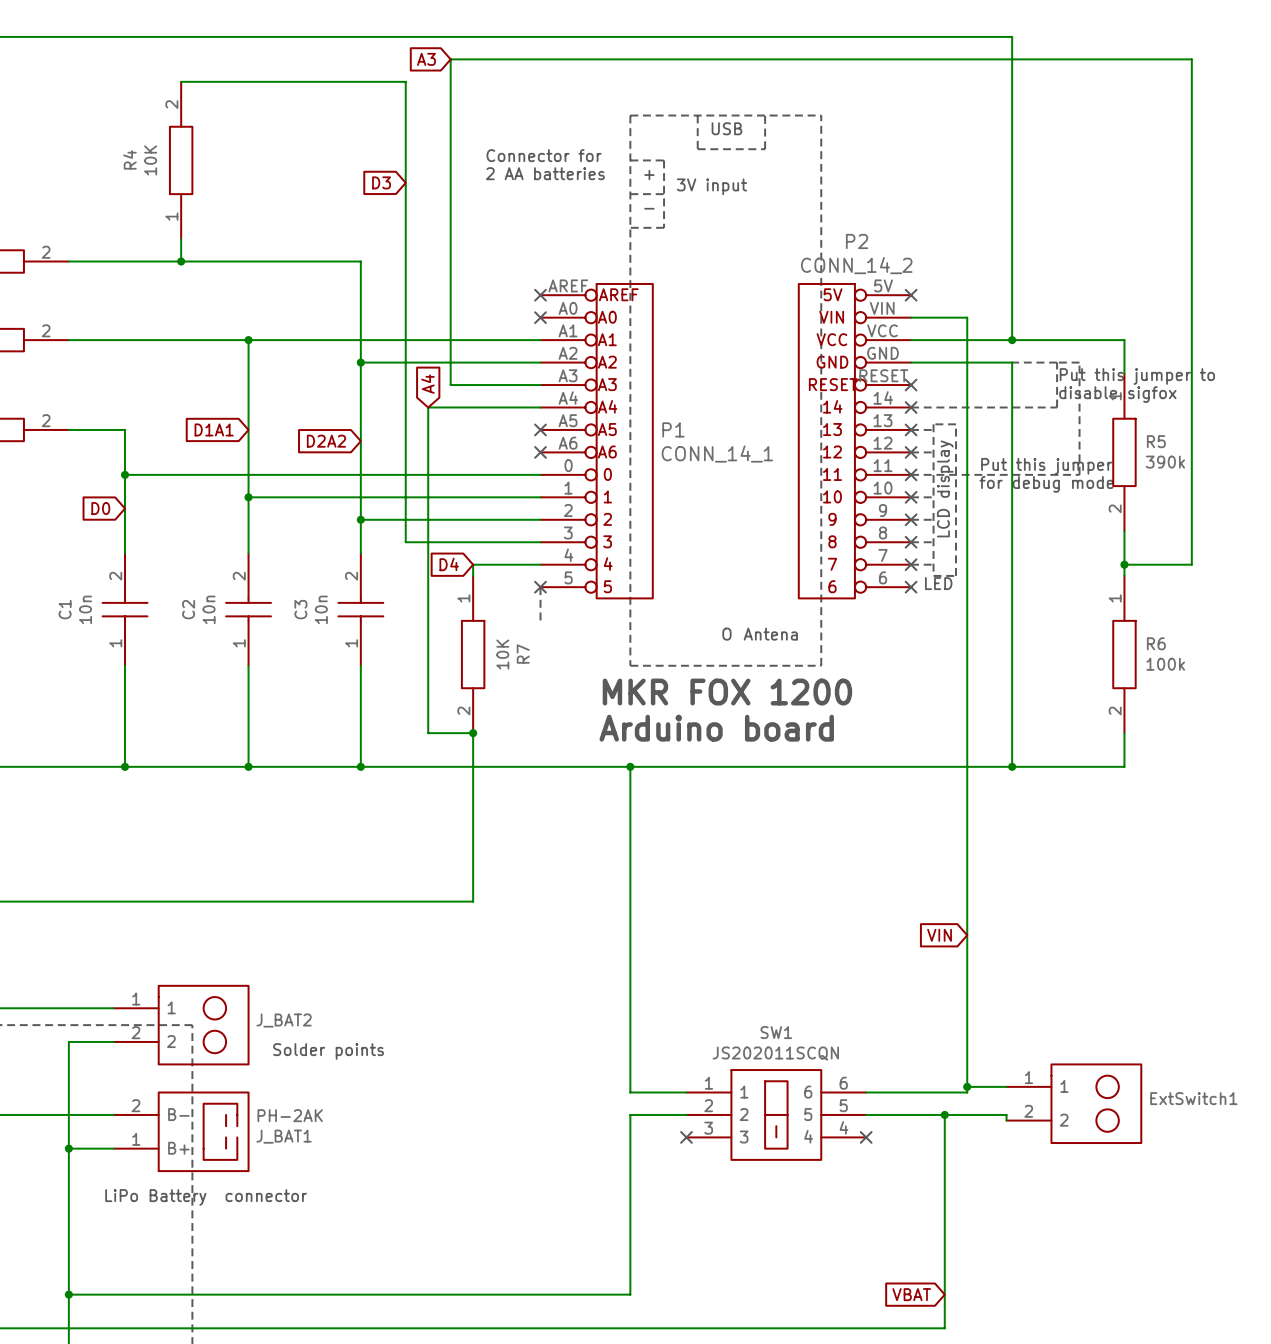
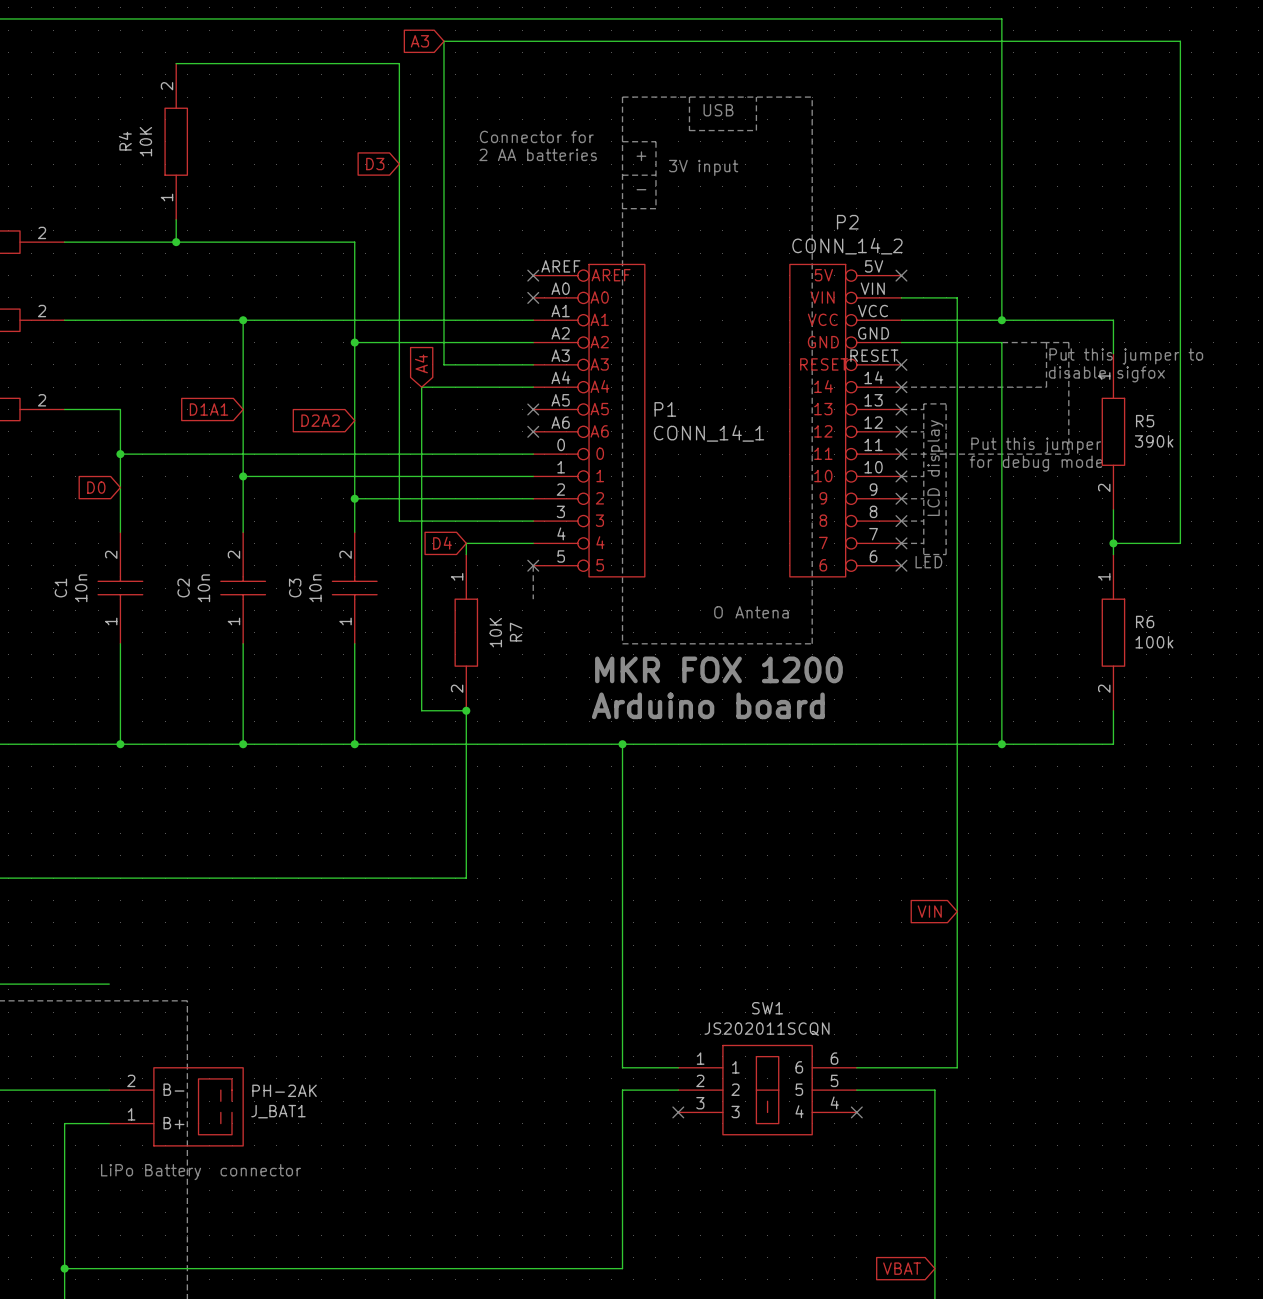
J_BAT2: (181, 1025) -> none
wire: (113, 1041) (68, 1041) (68, 1148) -> none
text: Solder points (328, 1051) -> none
wire: (967, 1086) (1006, 1086) -> none
junction: (967, 1086) -> none
ExtSwitch1: (1074, 1103) -> none
wire: (944, 1114) (1006, 1114) (1006, 1120) -> none
junction: (944, 1114) -> none
junction: (68, 1148) -> none

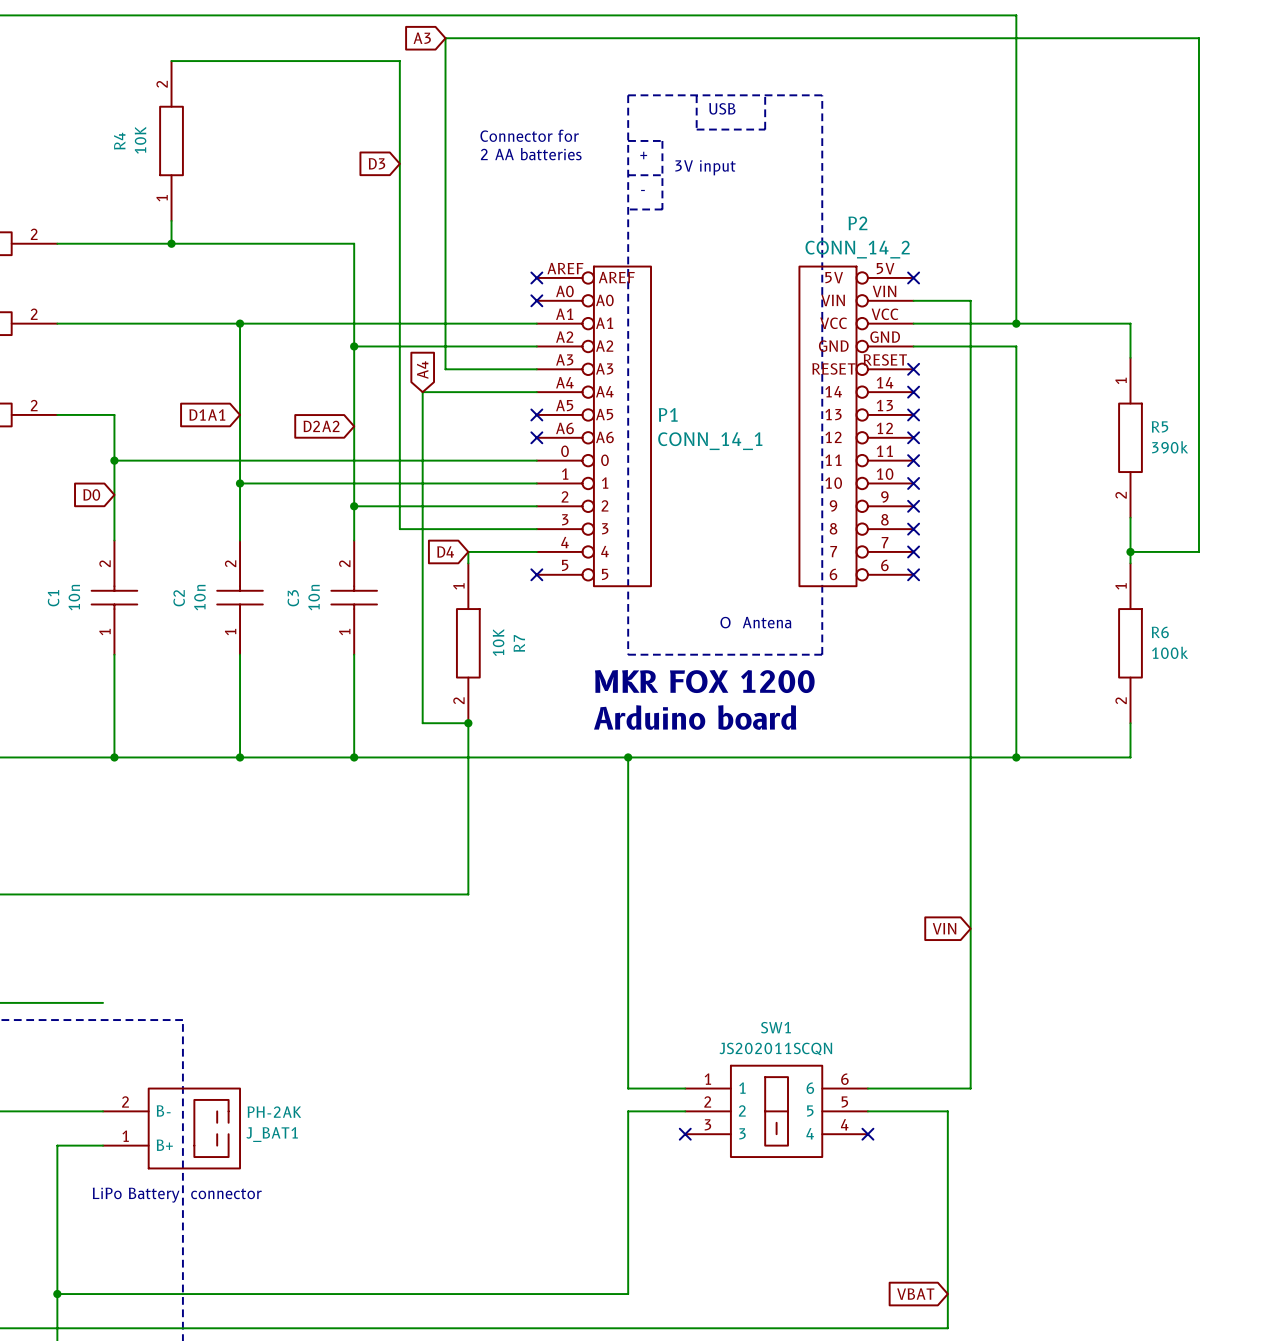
line: (1001, 342) (1068, 342) (1068, 454) (901, 454) -> none
line: (1046, 342) (1046, 387) (901, 387) -> none
text: Put this jumper to (1126, 356) -> none
text: disable sigfox (1106, 374) -> none
line: (923, 403) (923, 554) (946, 554) (946, 403) (923, 403) -> none
line: (901, 409) (923, 409) -> none
line: (901, 431) (923, 431) -> none
text: Put this jumper (1036, 445) -> none
text: for debug mode (1036, 463) -> none
text: LCD display (935, 468) -> none
line: (901, 476) (923, 476) -> none
line: (901, 498) (923, 498) -> none
line: (901, 521) (923, 521) -> none
line: (901, 543) (923, 543) -> none
text: LED (928, 562) -> none
line: (533, 565) (533, 599) -> none

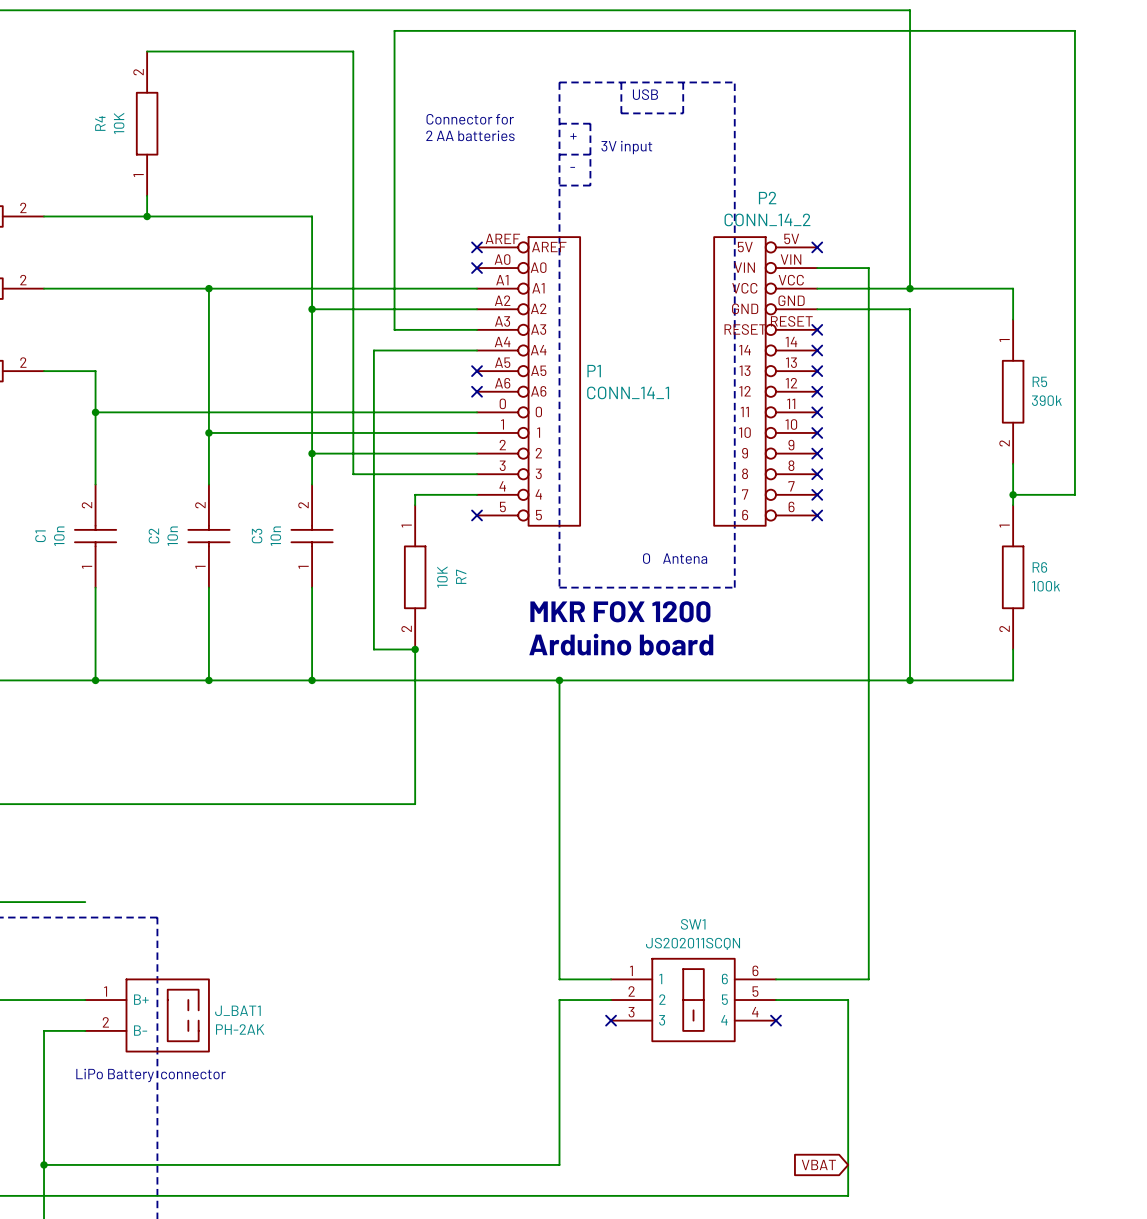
global label: A3 (422, 38) -> none
global label: D3 (376, 163) -> none
global label: A4 (422, 370) -> none
global label: D1A1 (207, 414) -> none
global label: D2A2 (321, 426) -> none
global label: D0 (91, 494) -> none
global label: D4 (445, 551) -> none
global label: VIN (944, 928) -> none
J_BAT1 flip: as is (194, 1128) -> up-down (167, 1015)

